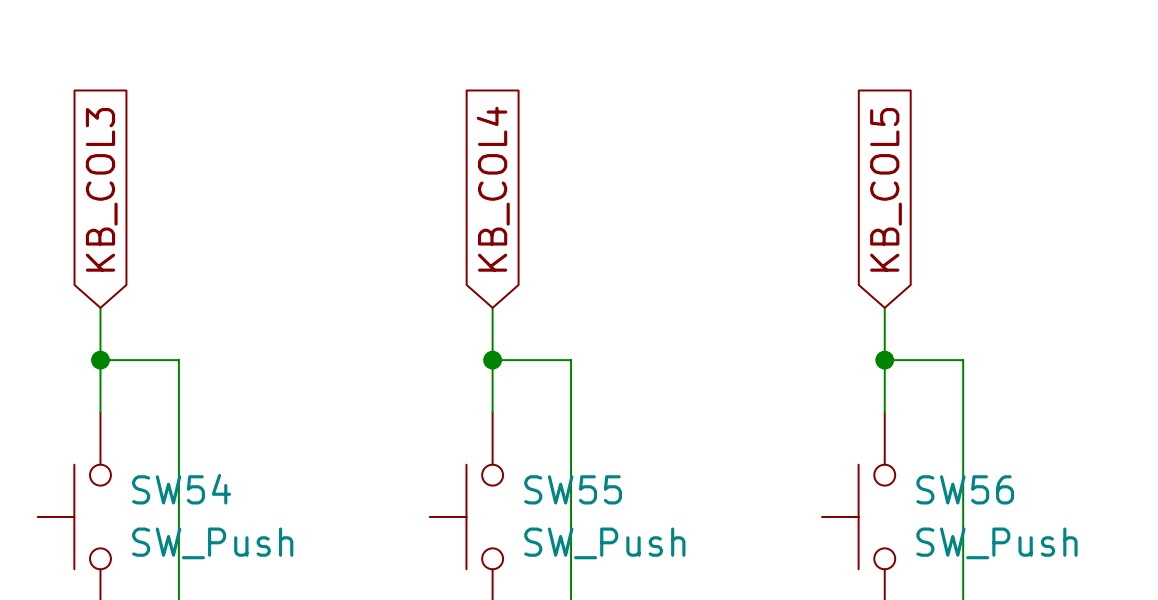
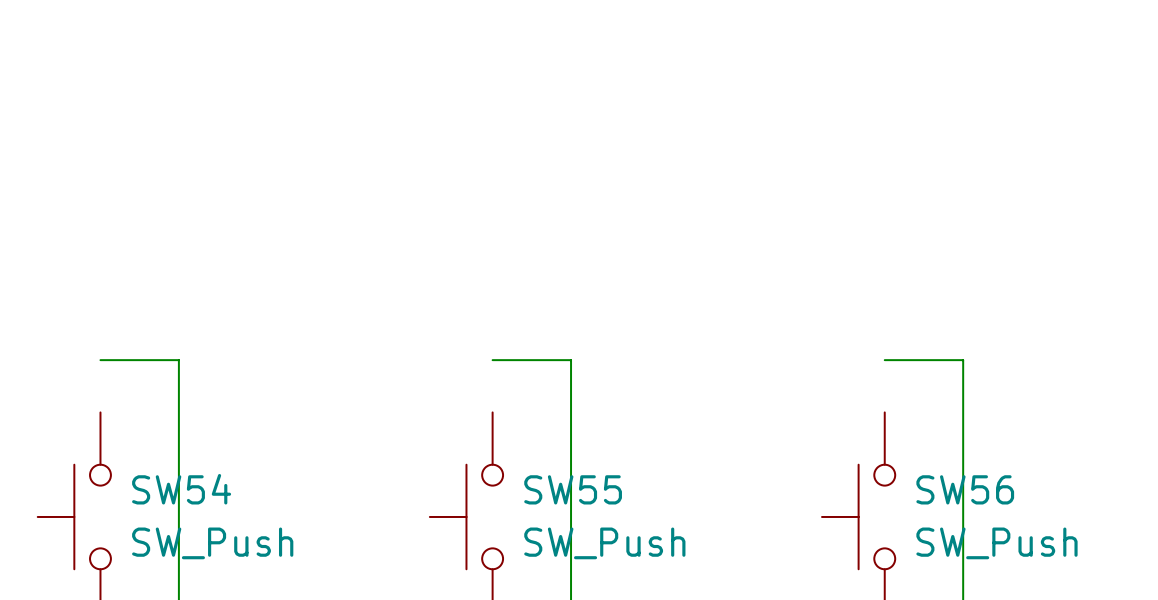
global label: KB_COL3 (101, 189) -> none
global label: KB_COL4 (493, 189) -> none
global label: KB_COL5 (885, 189) -> none
wire: (100, 307) (100, 412) -> none
wire: (492, 307) (492, 412) -> none
wire: (884, 307) (884, 412) -> none
junction: (100, 360) -> none
junction: (492, 360) -> none
junction: (884, 360) -> none

